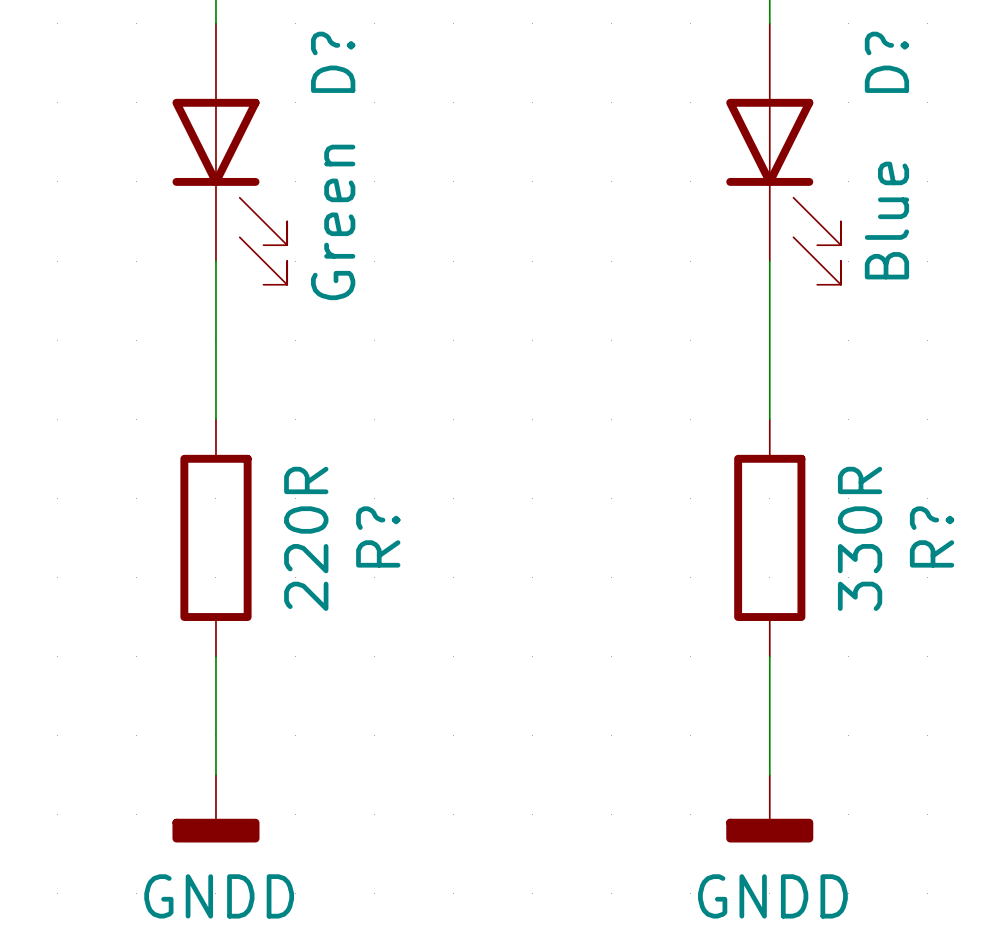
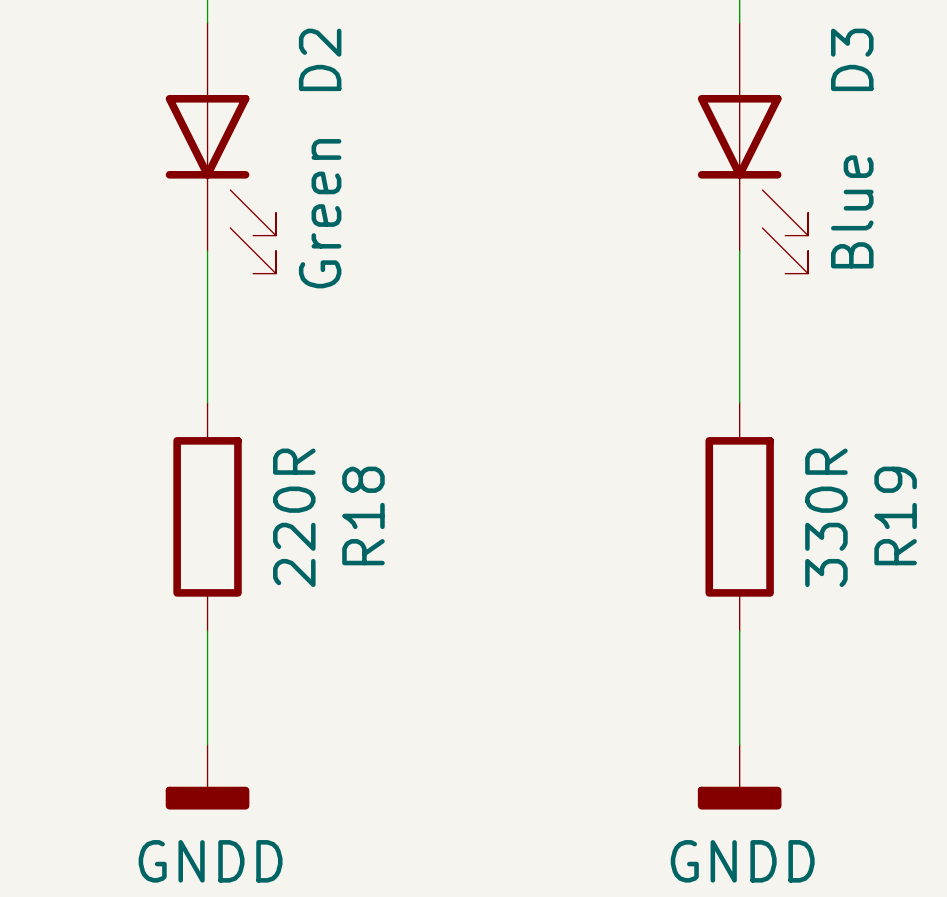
D? name: D? (333, 62) -> D2 (320, 59)
D? name: D? (886, 62) -> D3 (852, 59)
R? name: R? (378, 536) -> R18 (363, 515)
R? name: R? (932, 536) -> R19 (895, 515)

